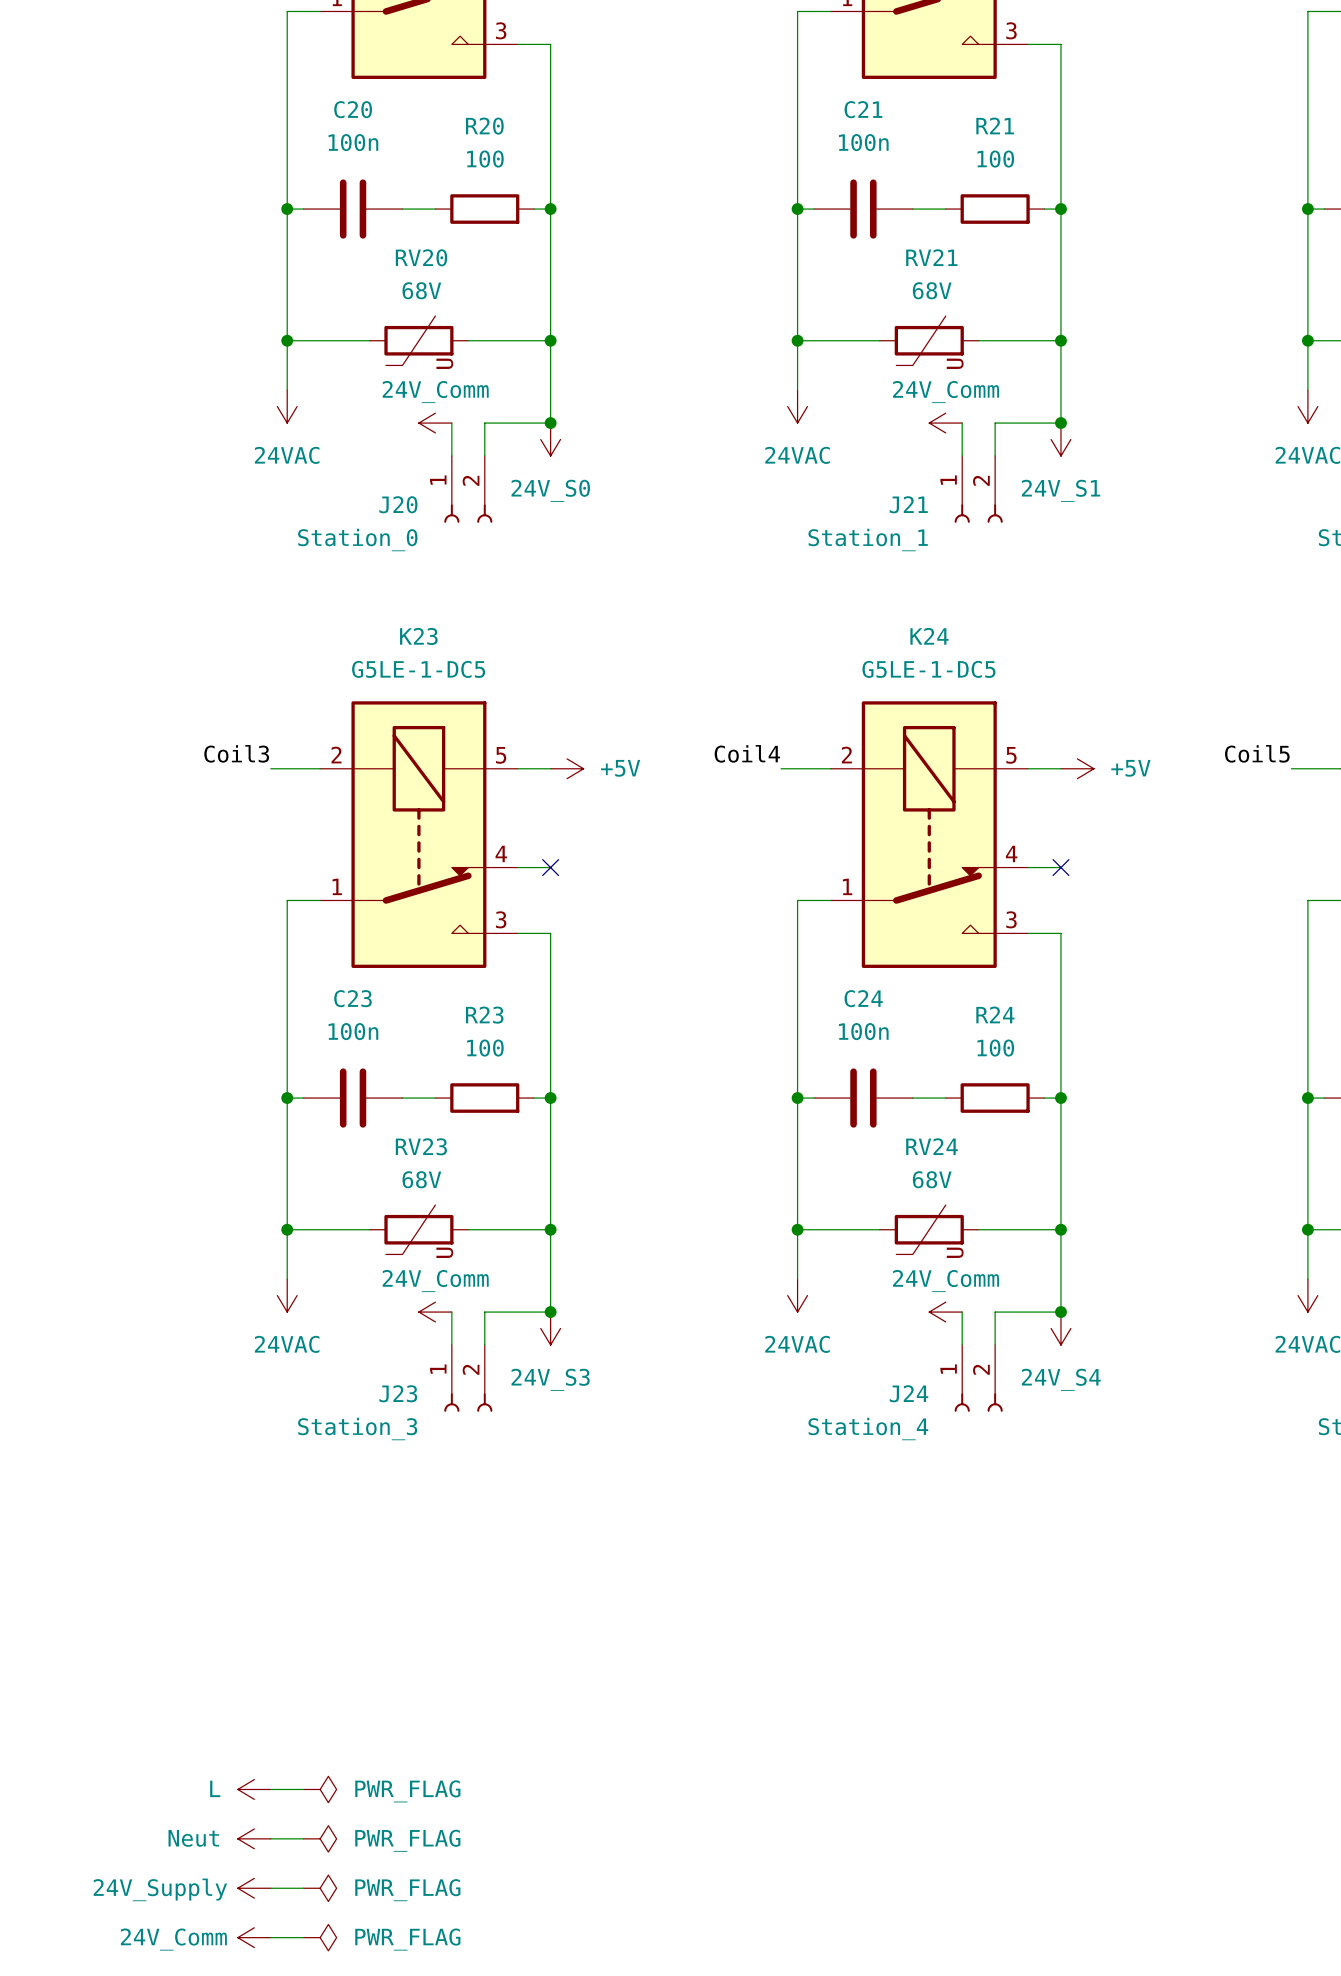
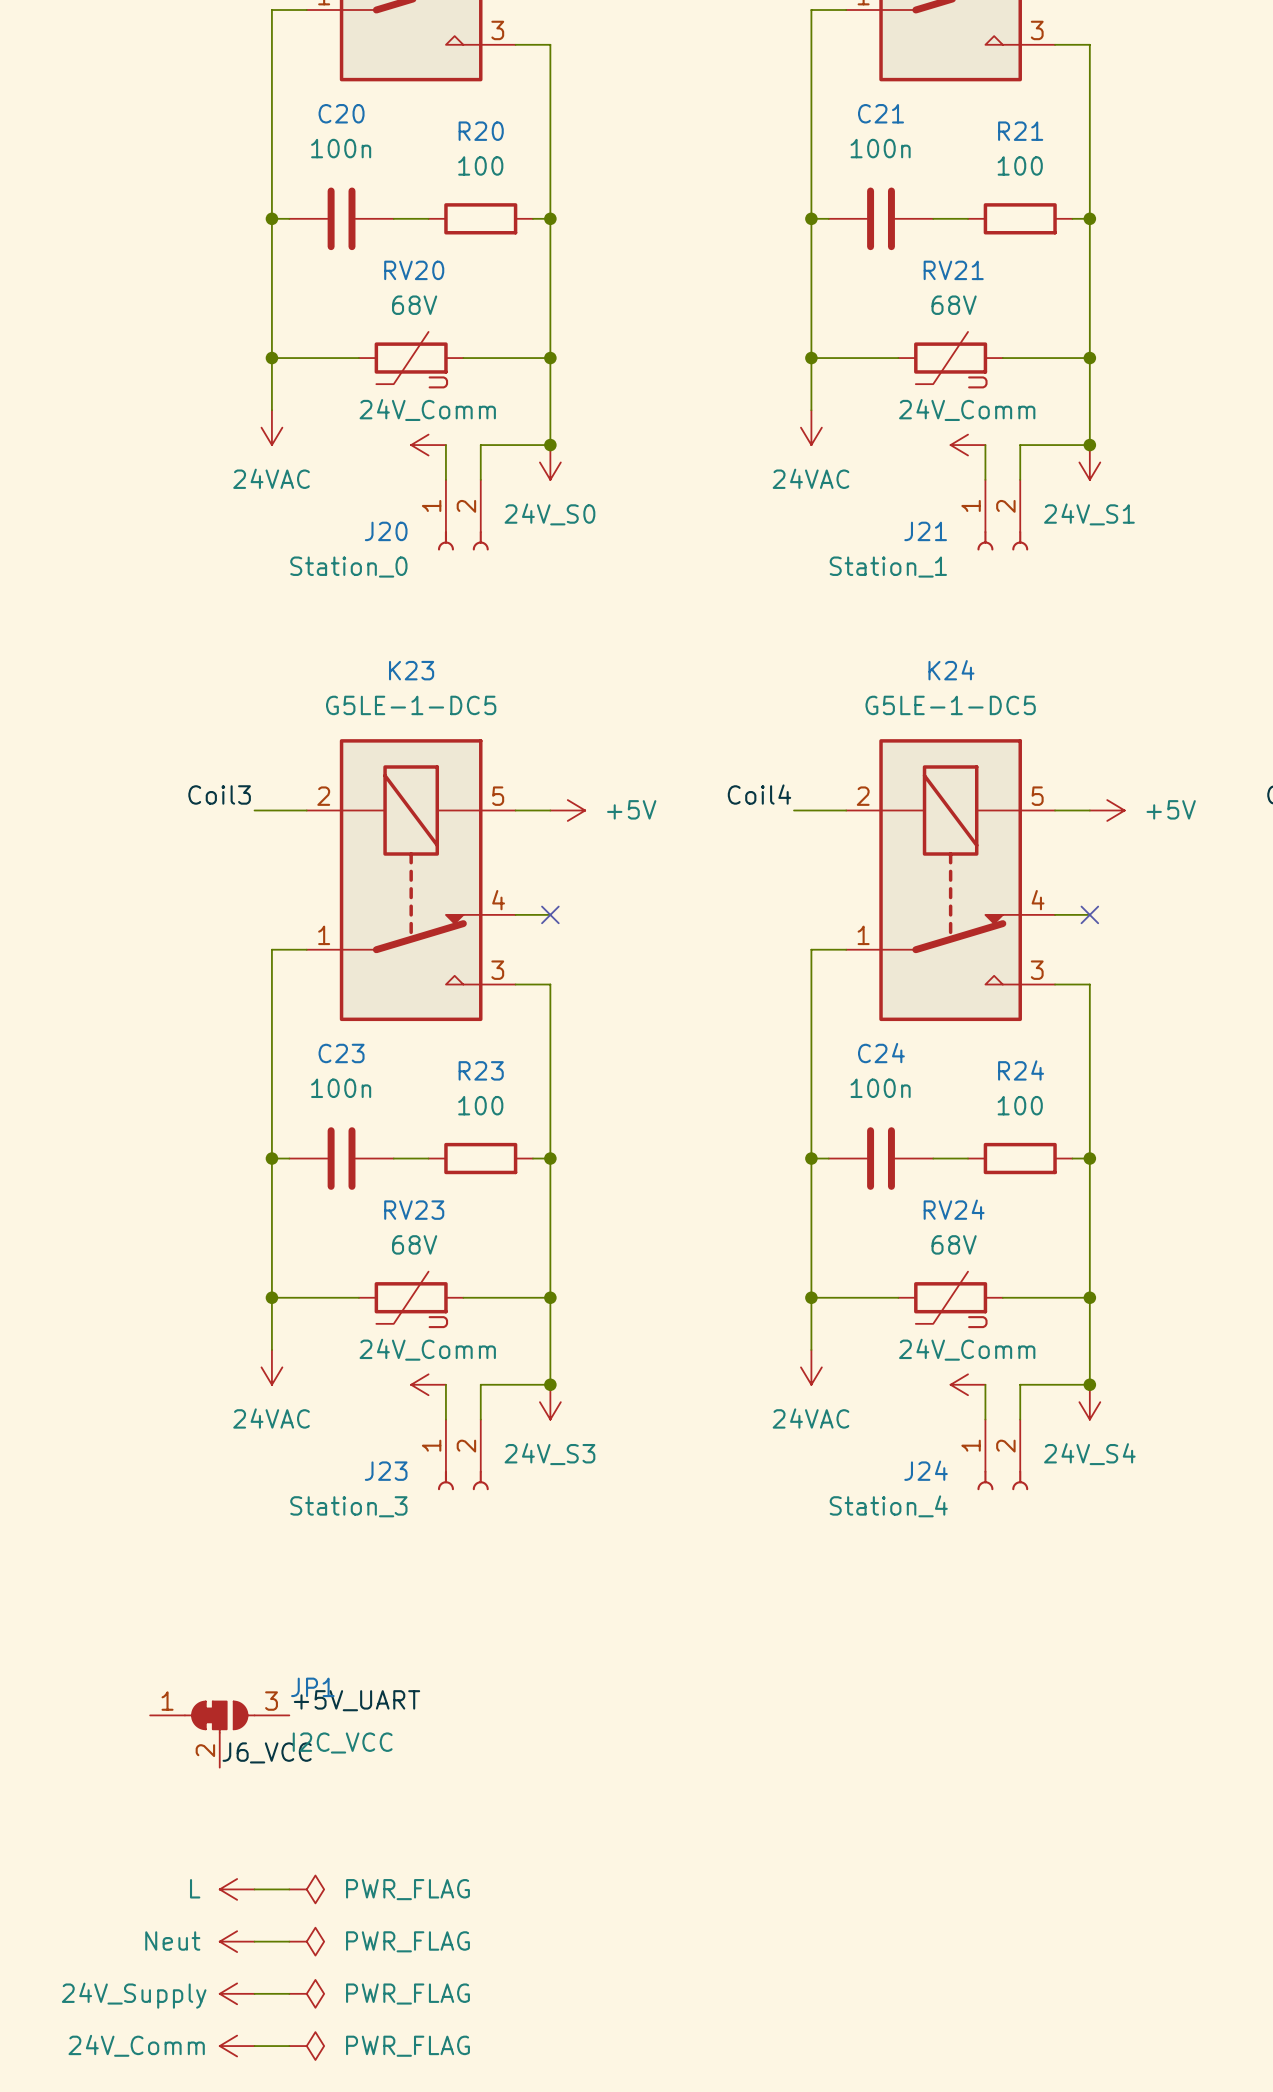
label: none -> +5V_UART (357, 1700)
JP1: none -> I2C_VCC (219, 1734)
label: none -> J6_VCC (267, 1752)

